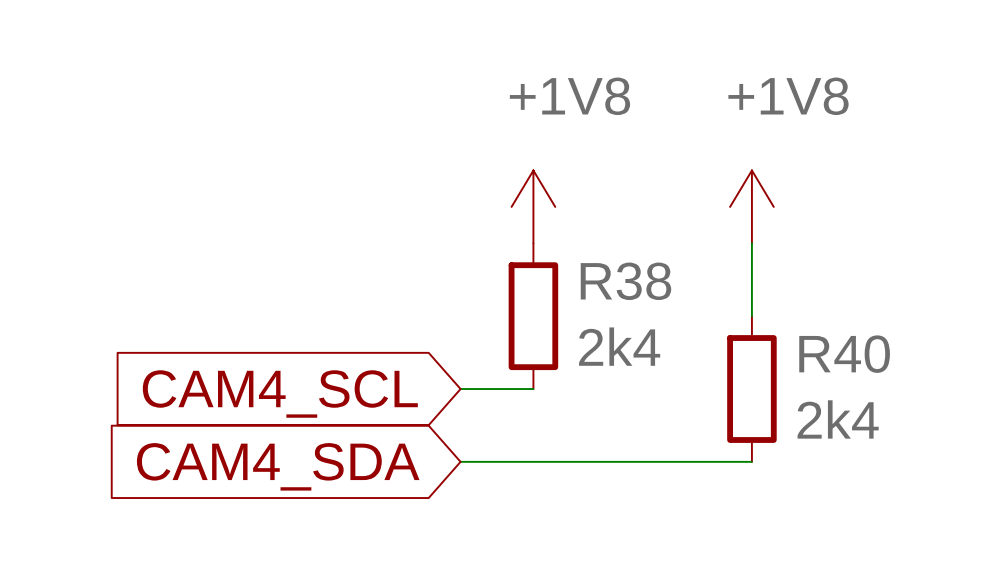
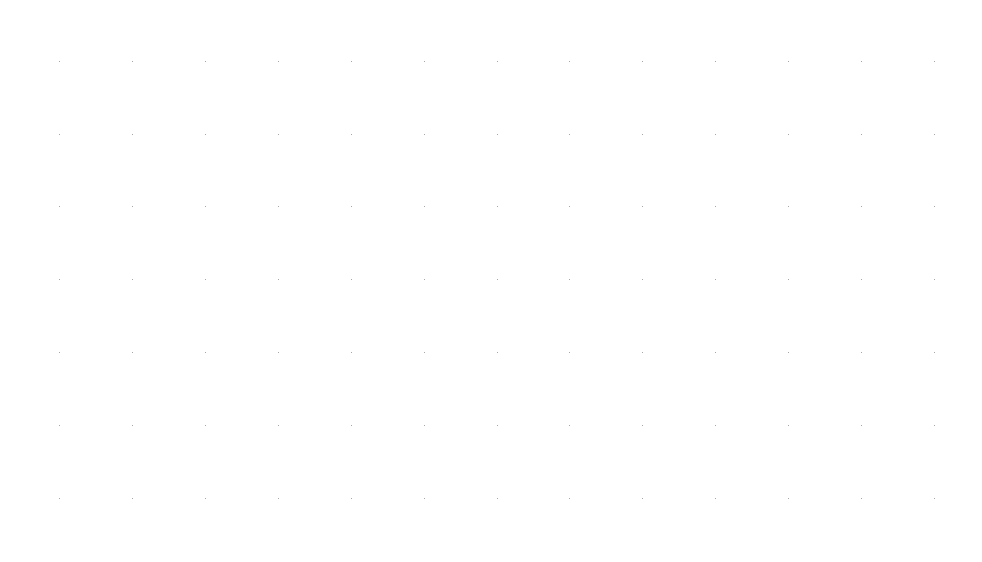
power symbol: +1V8 (533, 206) -> none
power symbol: +1V8 (751, 206) -> none
wire: (751, 243) (751, 316) -> none
R38: 2k4 (533, 316) -> none
wire: (460, 389) (533, 389) -> none
R40: 2k4 (751, 389) -> none
global label: CAM4_SCL (280, 394) -> none
wire: (460, 461) (751, 461) -> none
global label: CAM4_SDA (278, 466) -> none

